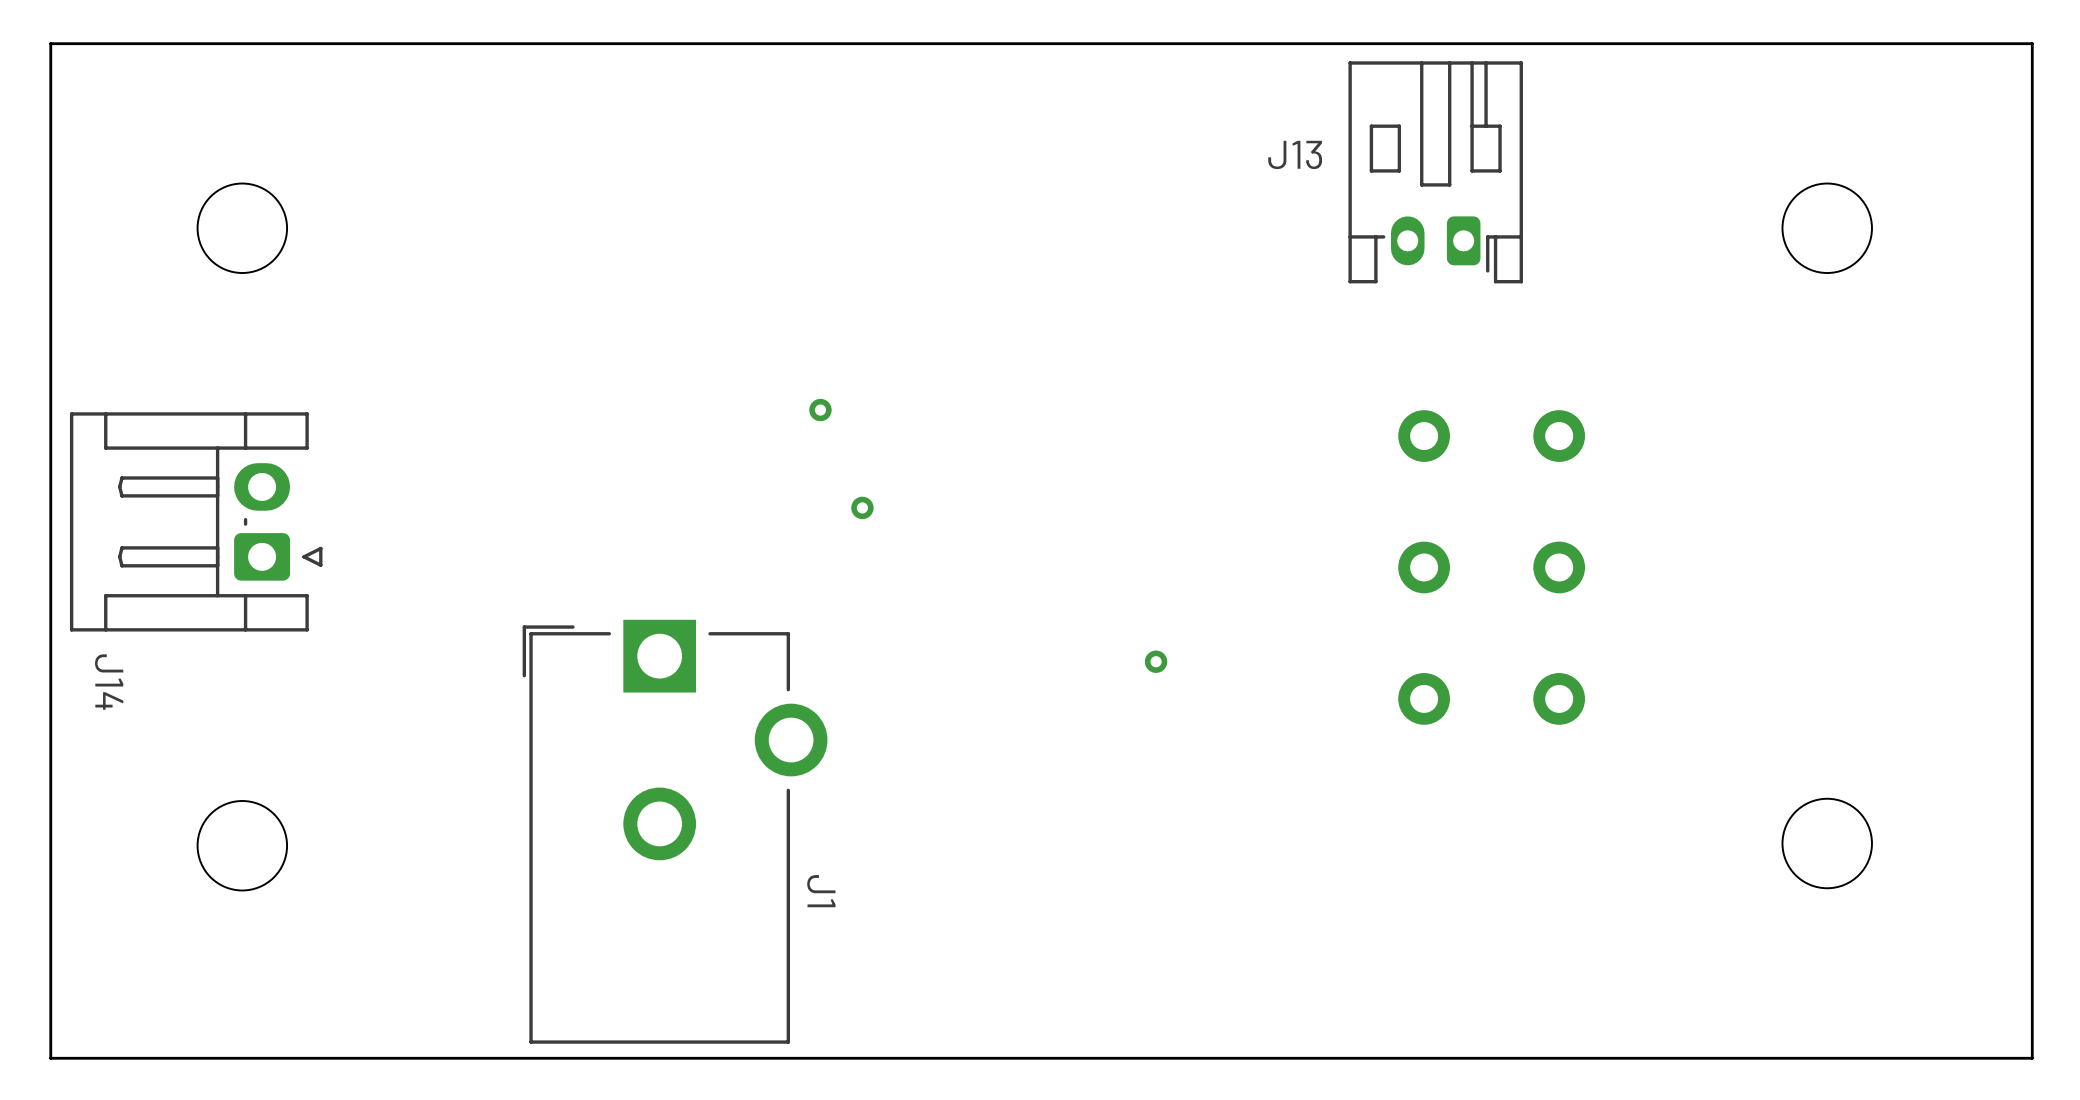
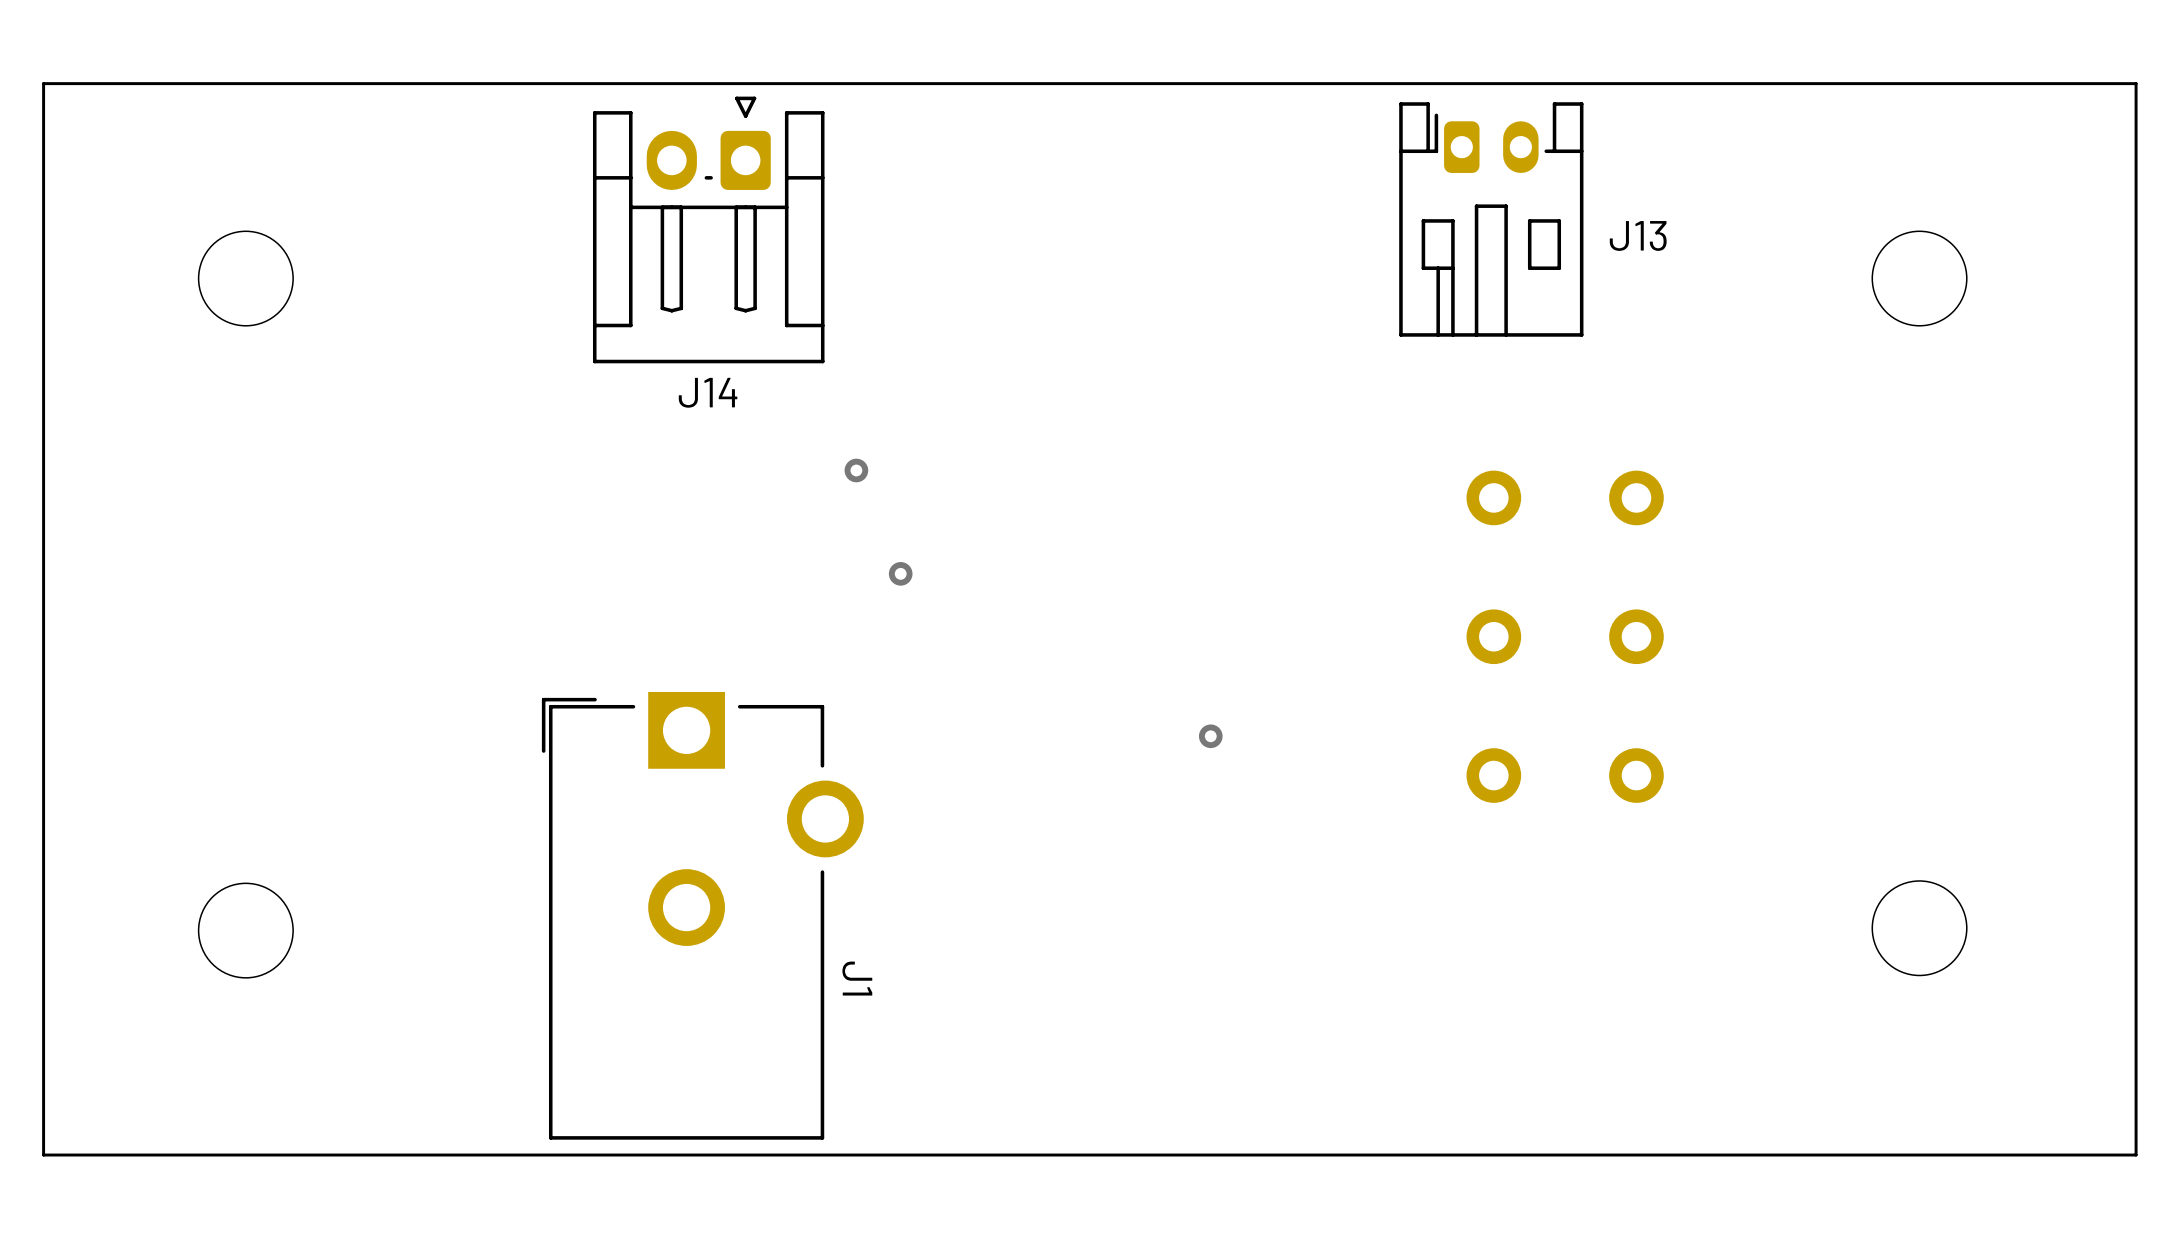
J13 rotation: 0° (1435, 172) -> 180° (1491, 219)
J14 rotation: 0° (196, 521) -> 90° counterclockwise (708, 229)
J14 position: (196, 521) -> (708, 229)
J14 name position: J14 (109, 682) -> J14 (708, 392)

